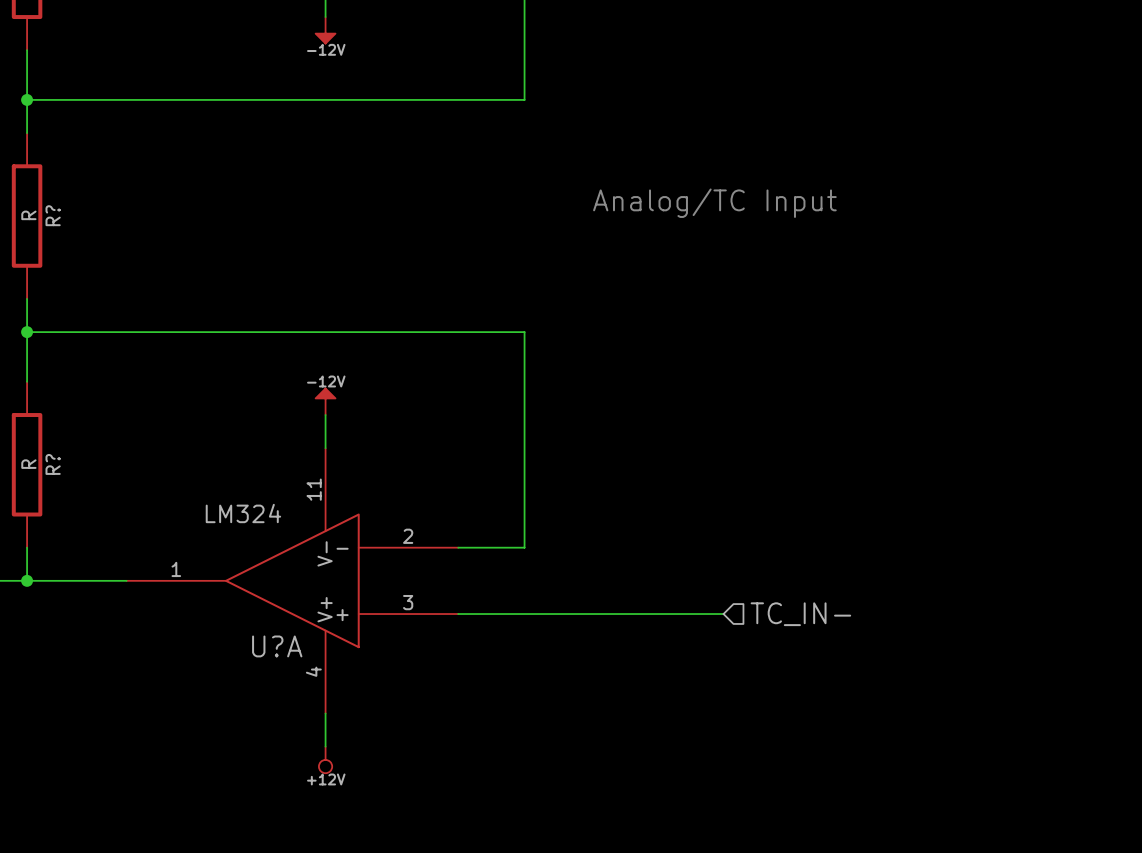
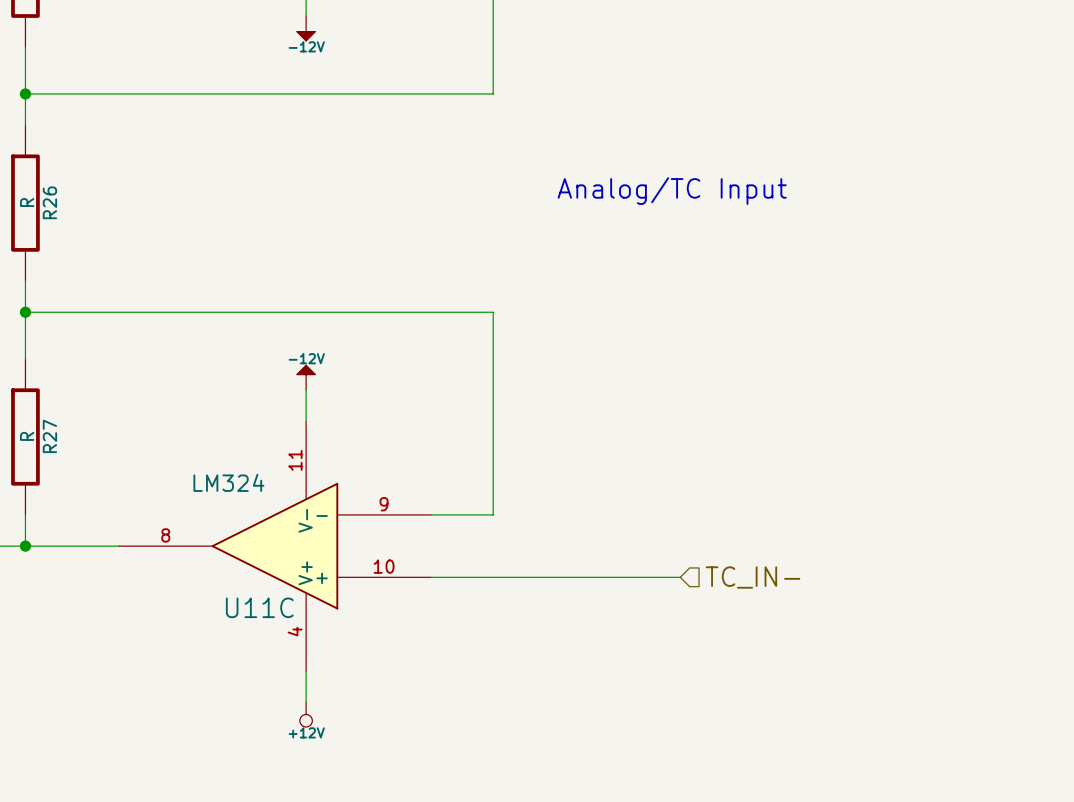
R? name: R? (53, 215) -> R26 (49, 202)
R? name: R? (53, 464) -> R27 (49, 436)
U?A pin number: 2 (408, 536) -> 9 (384, 504)
U?A pin number: 1 (176, 569) -> 8 (165, 535)
U?A pin number: 3 (408, 602) -> 10 (384, 566)
U?A name: U?A (277, 646) -> U11C (259, 607)

